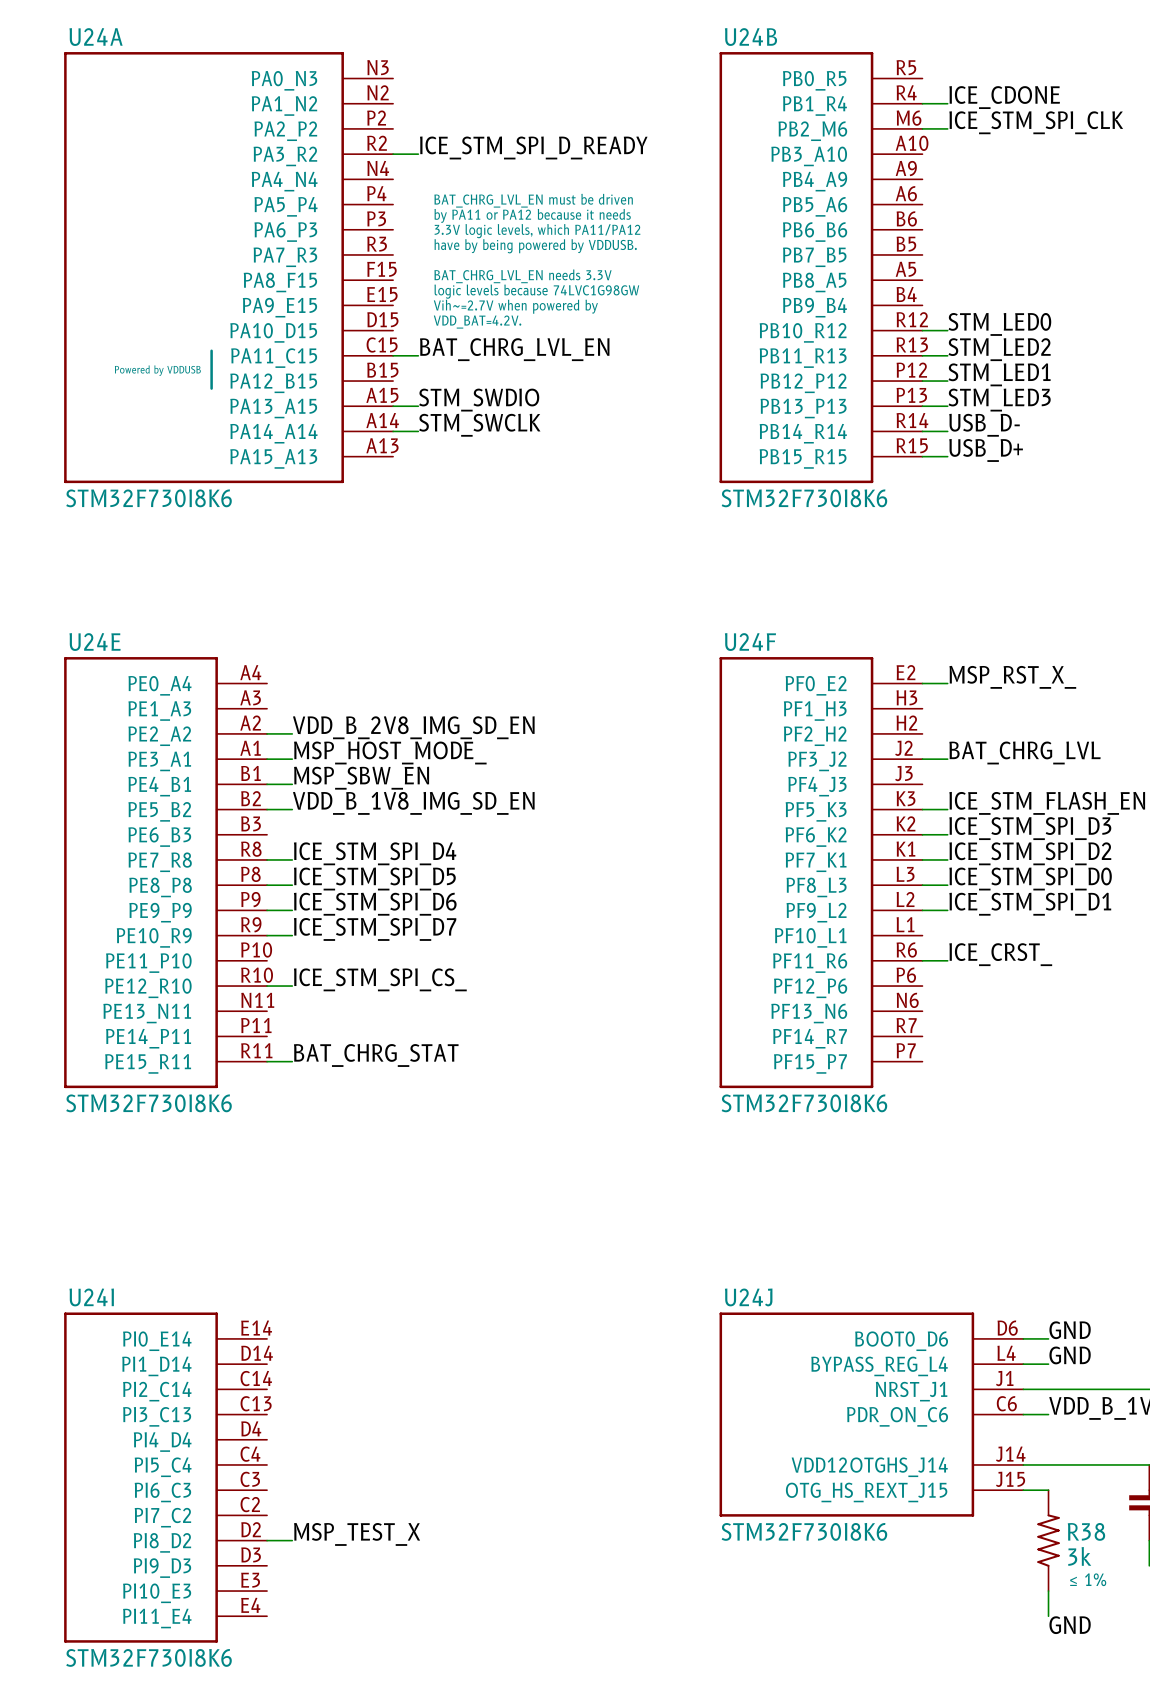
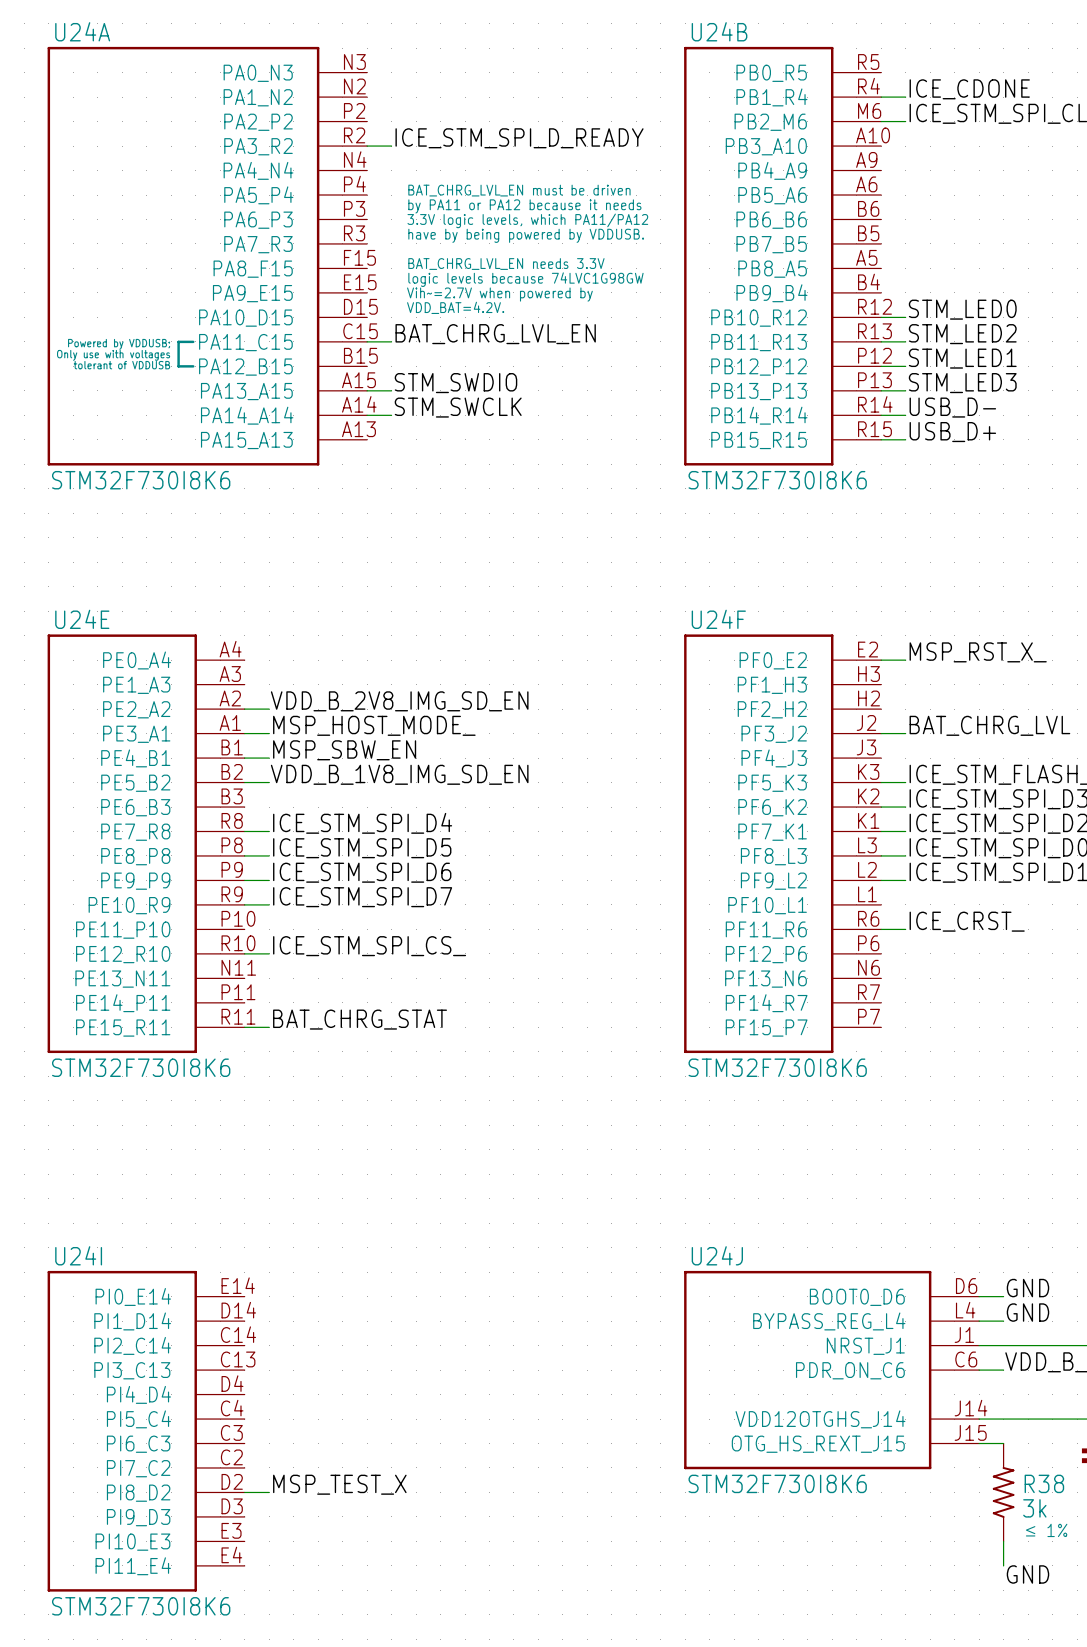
U24A symbol: [64, 52, 394, 484] -> [47, 46, 368, 466]

